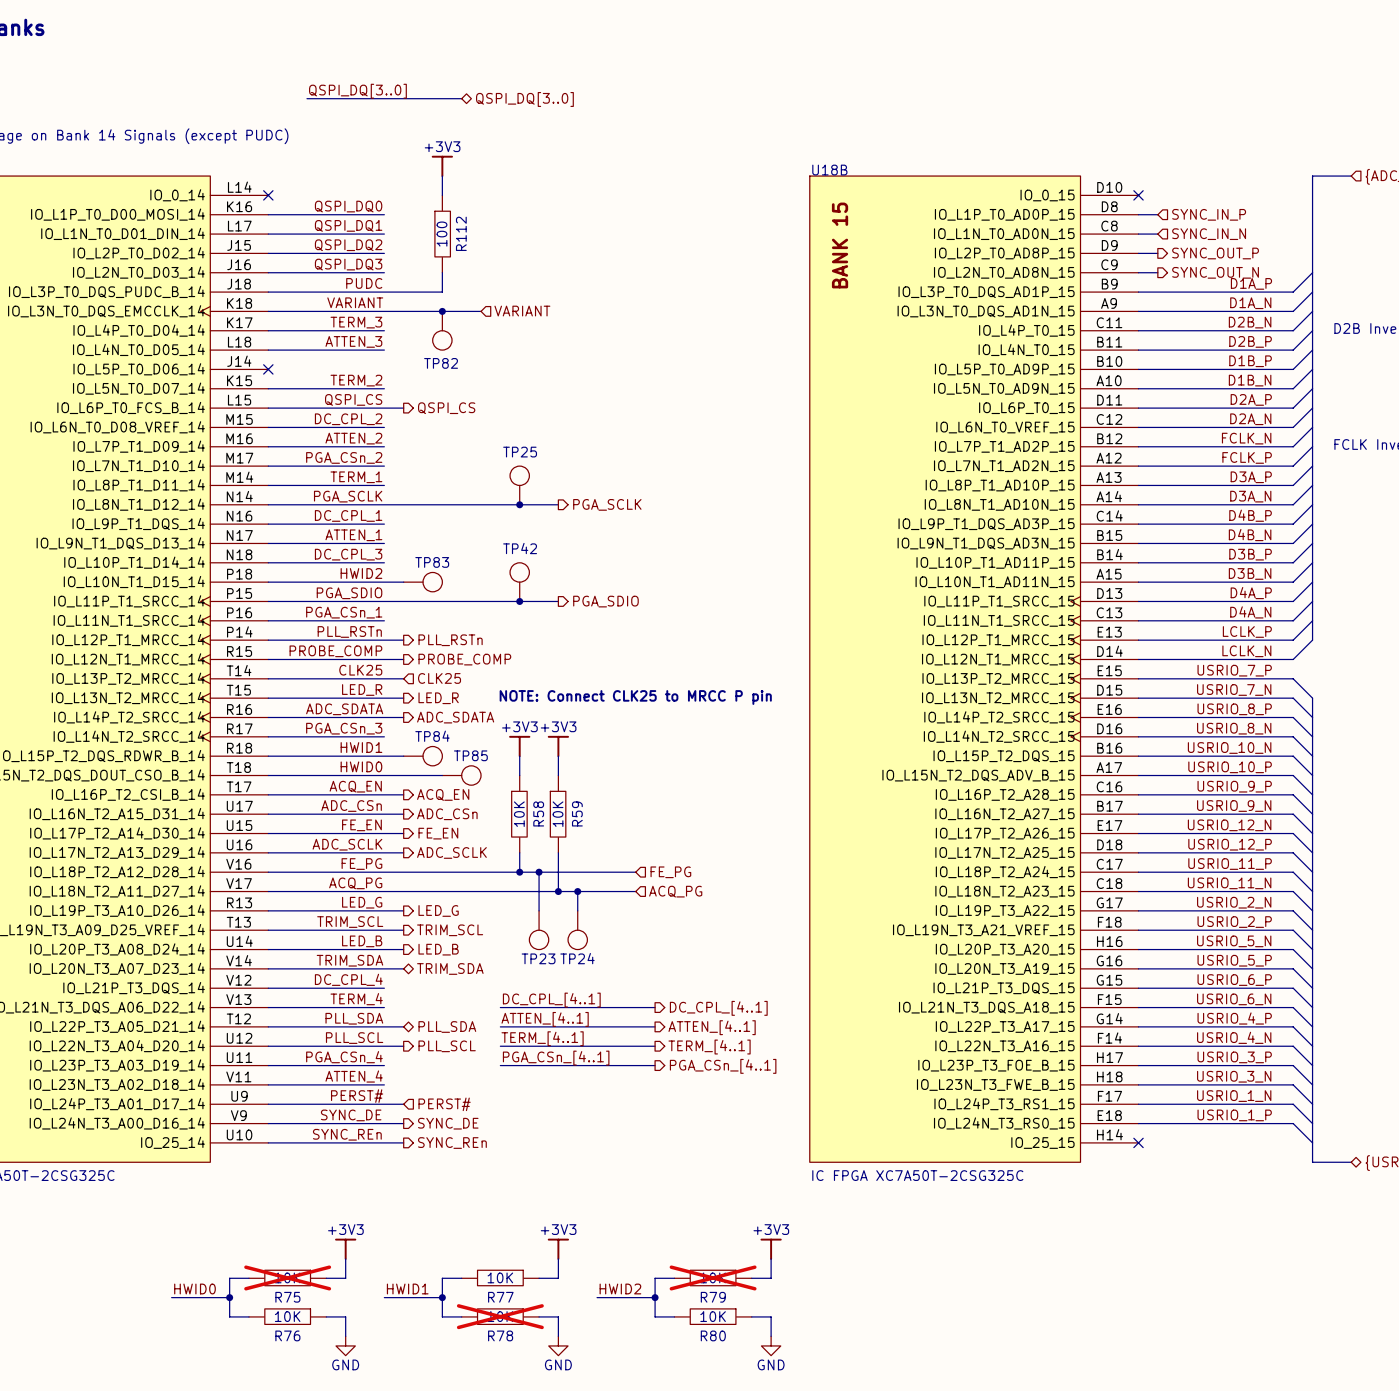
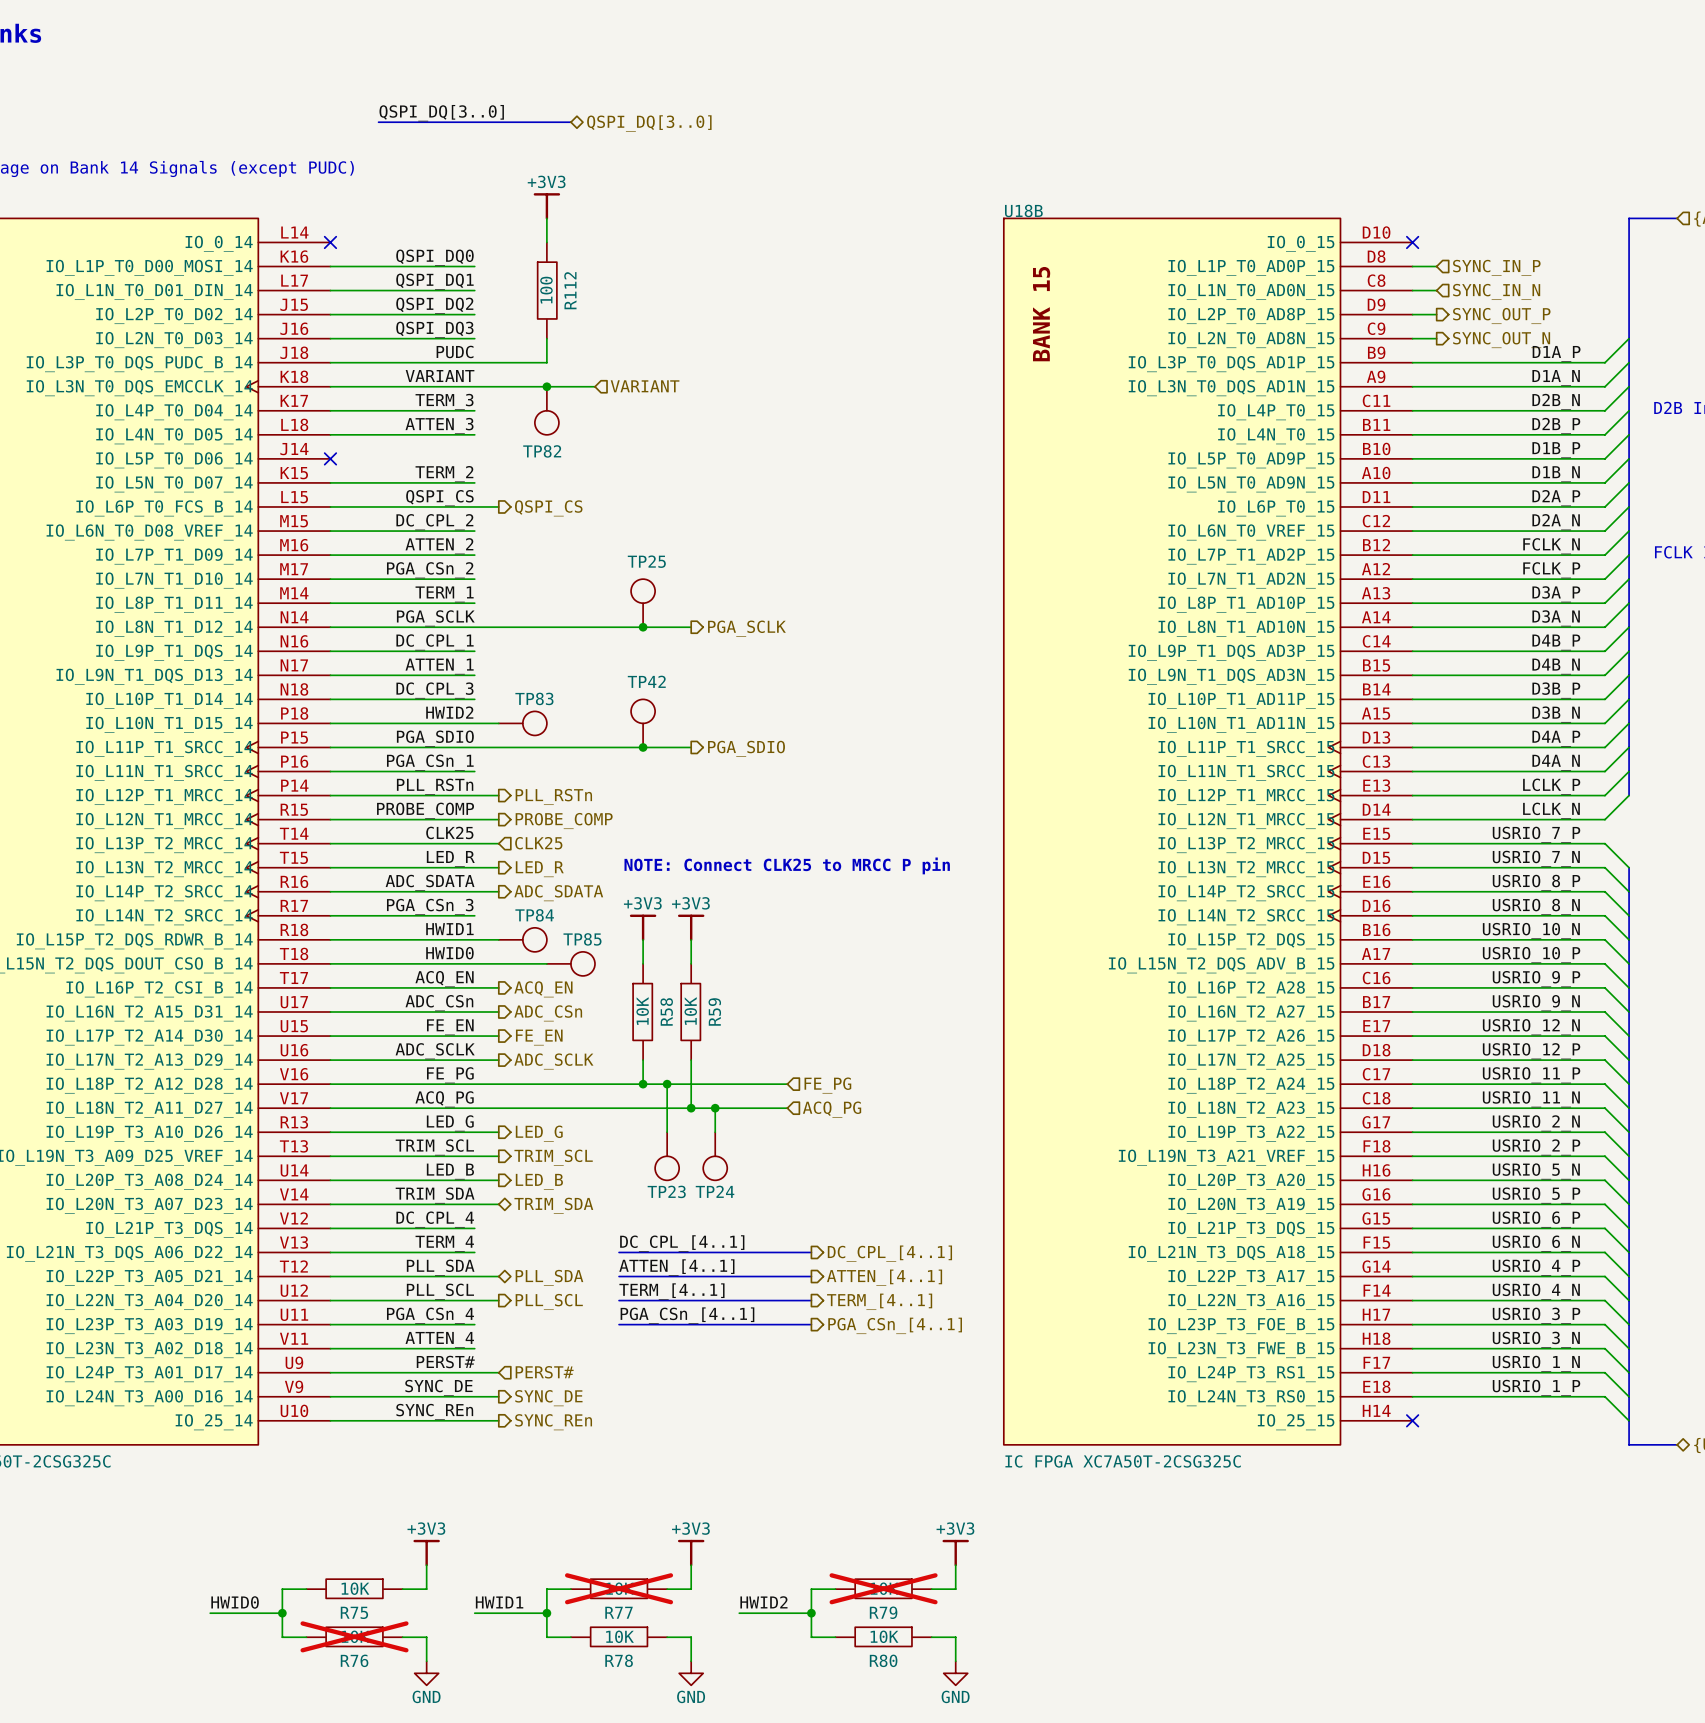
R75 do-not-place cross: (287, 1277) -> none
R77 do-not-place cross: none -> (619, 1588)
R76 do-not-place cross: none -> (354, 1636)
R78 do-not-place cross: (500, 1316) -> none

